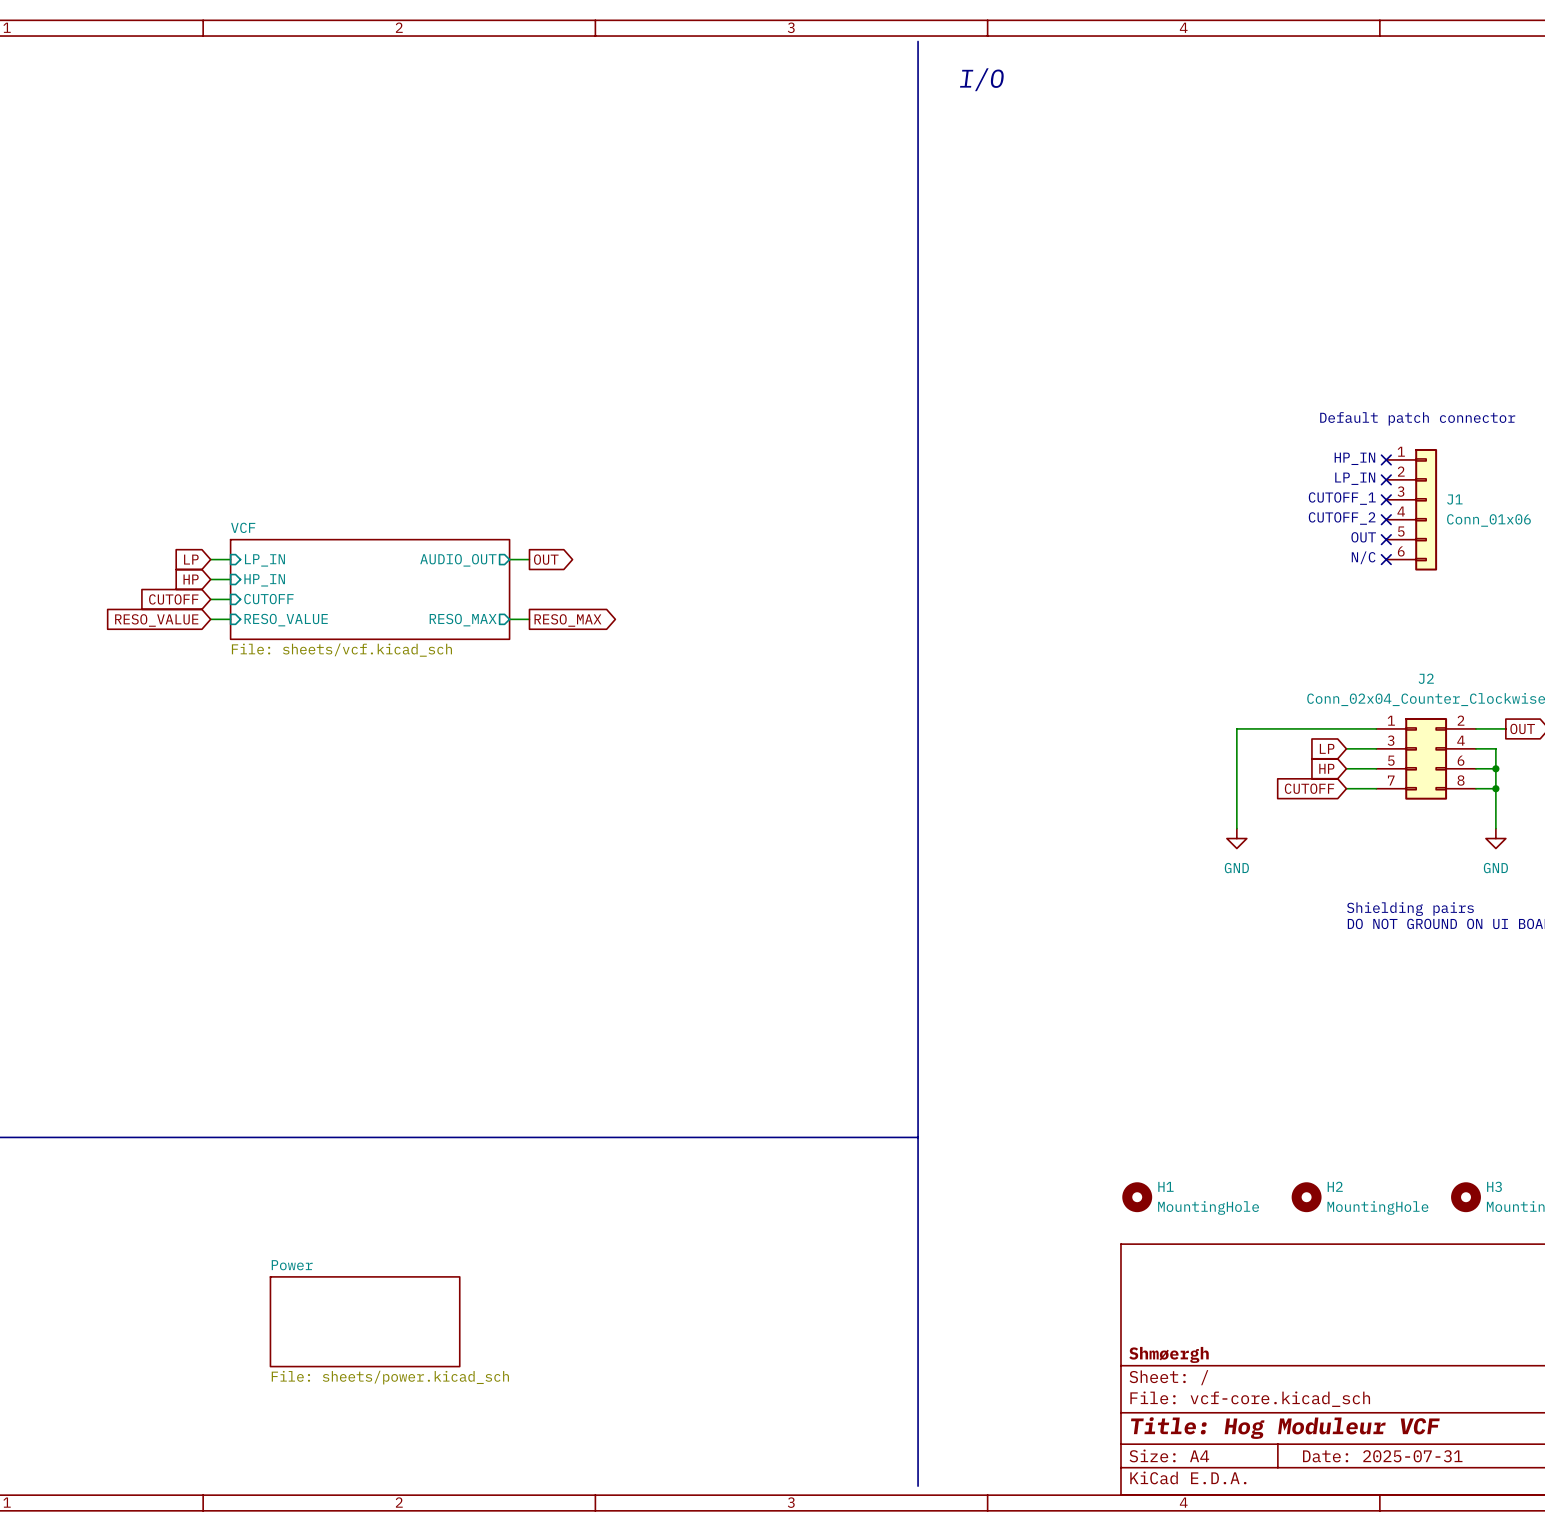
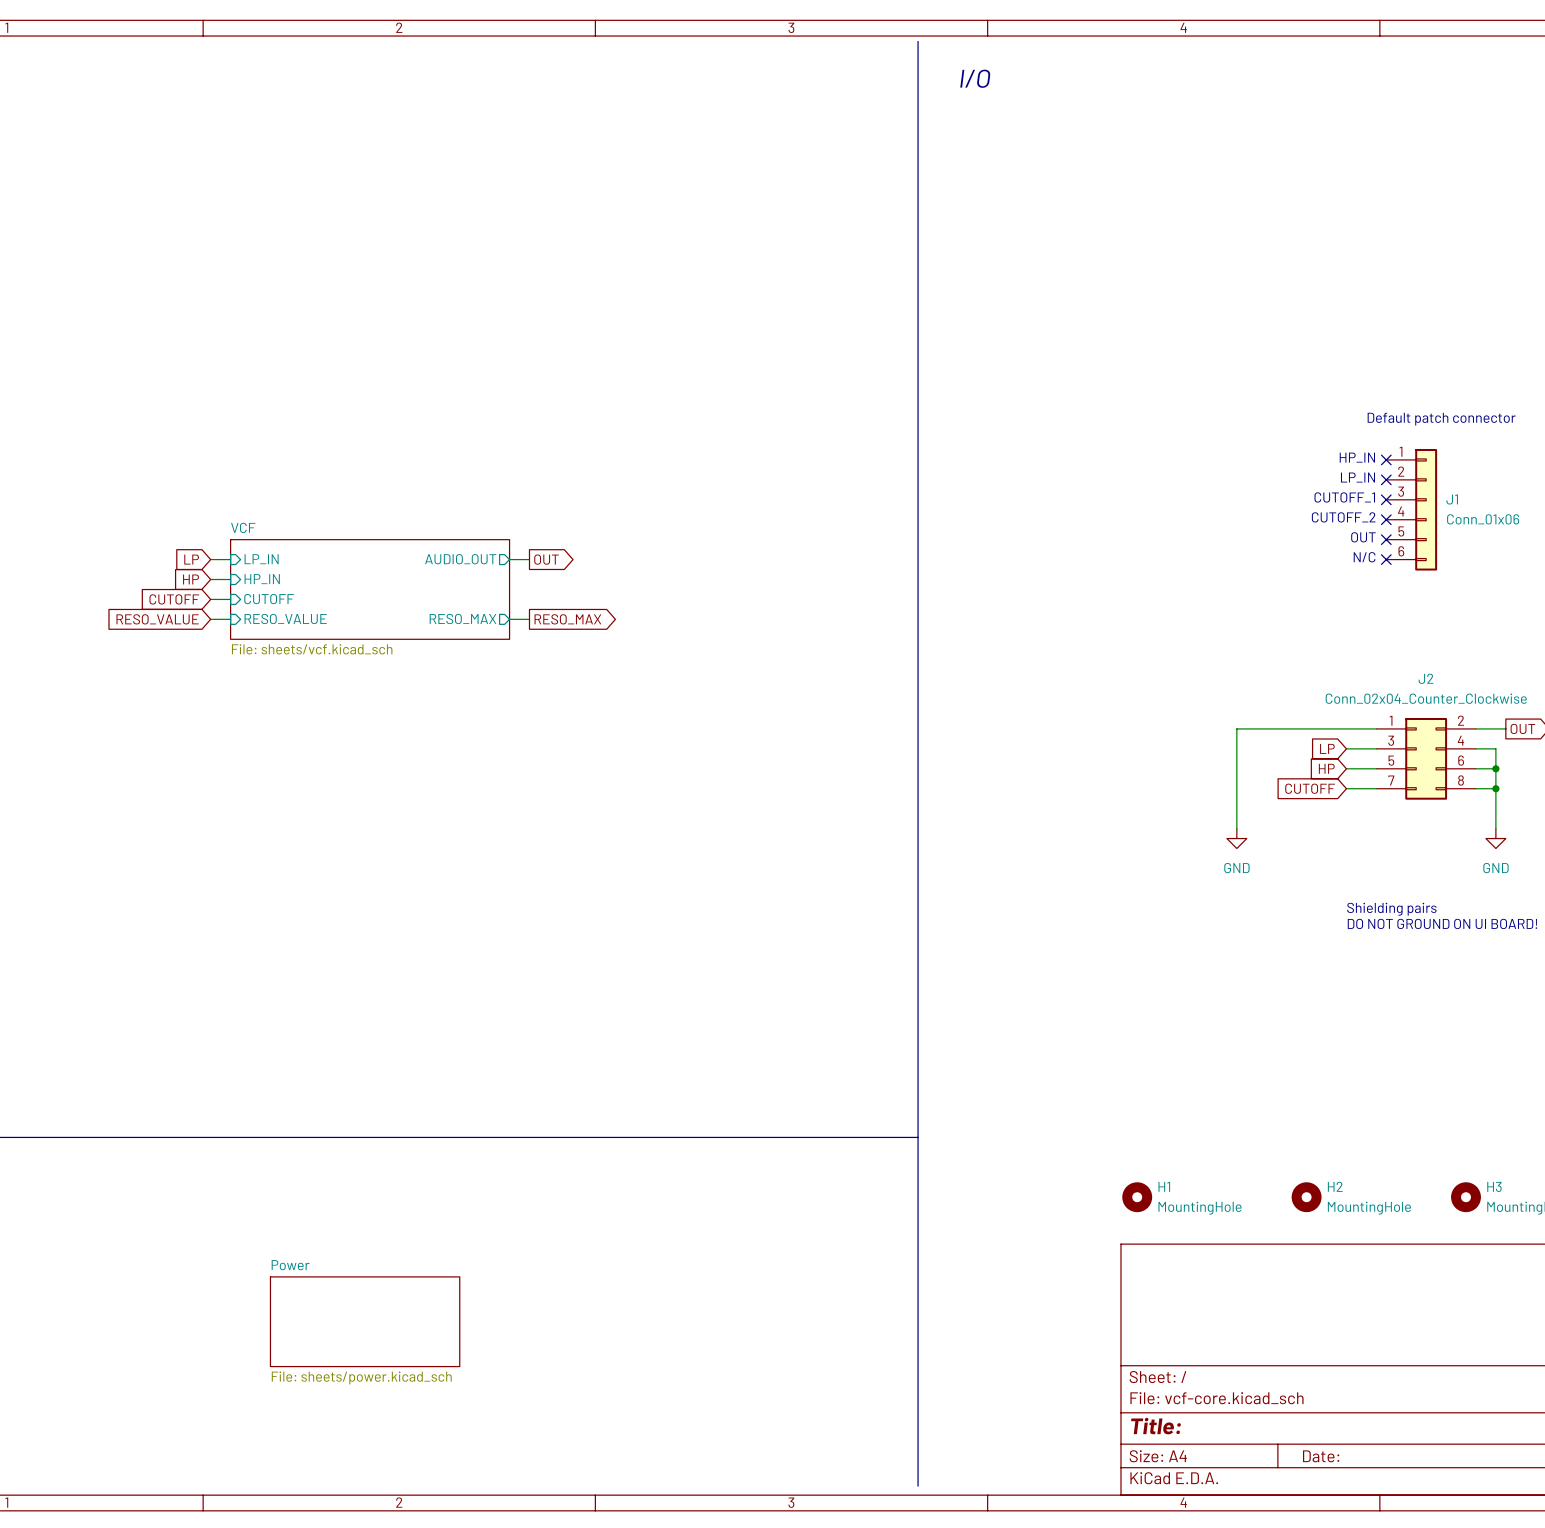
title block: Shmøergh (1169, 1354) -> none
title block: Title: Hog Moduleur VCF (1285, 1428) -> Title: (1156, 1426)
title block: Date: 2025-07-31 (1382, 1456) -> Date: (1321, 1456)

